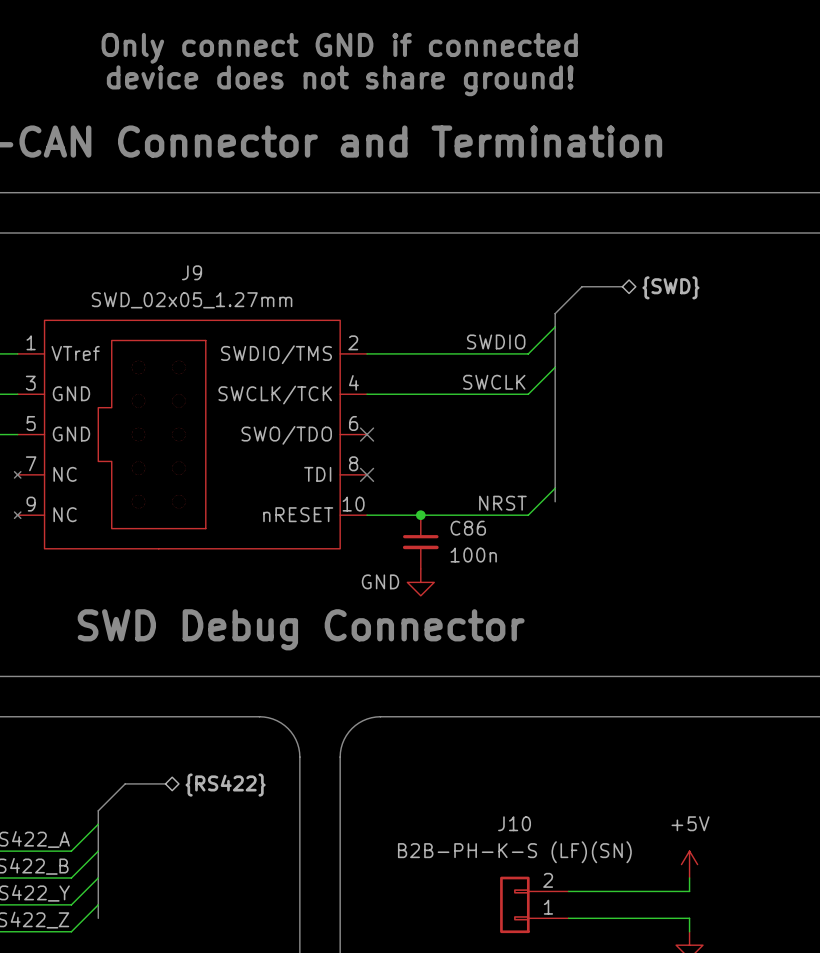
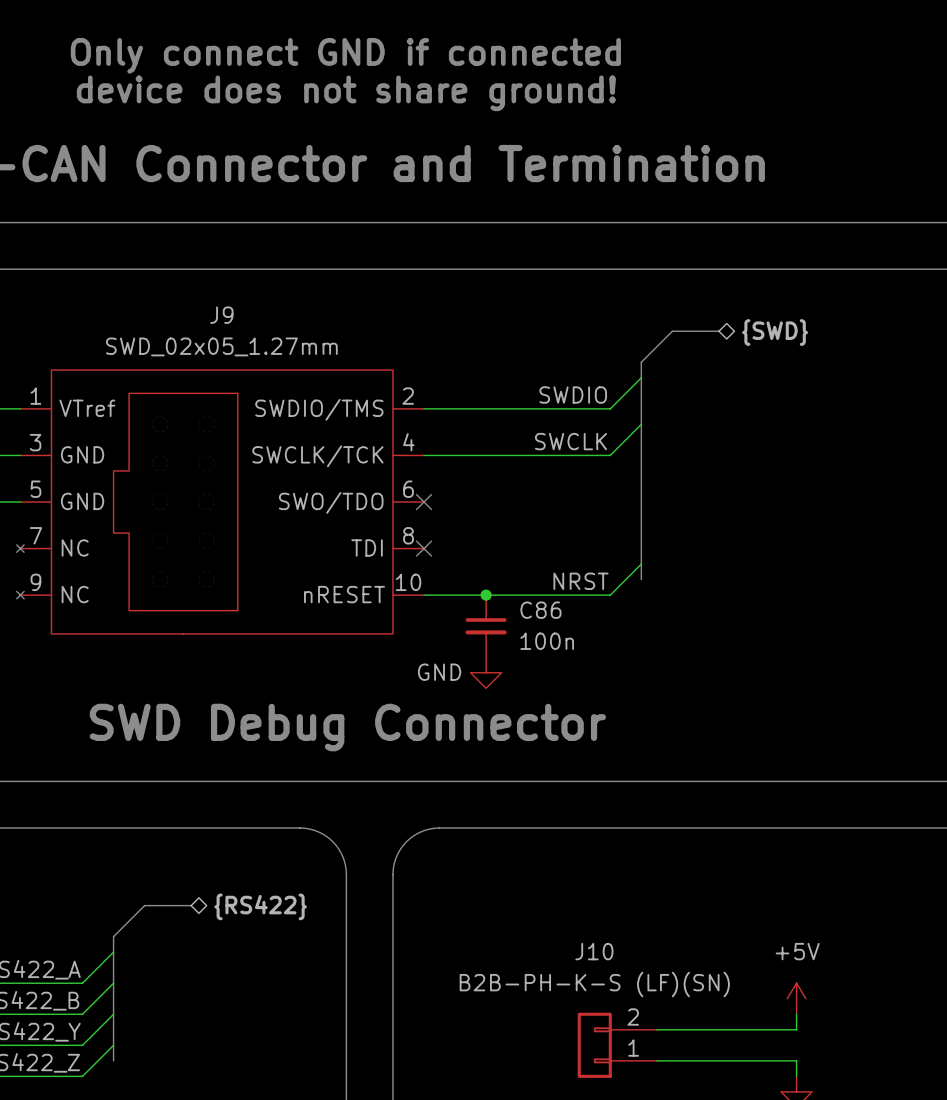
text position: Only connect GND if connected (339, 48) -> Only connect GND if connected (345, 55)
text position: device does not share ground! (340, 80) -> device does not share ground! (346, 93)

